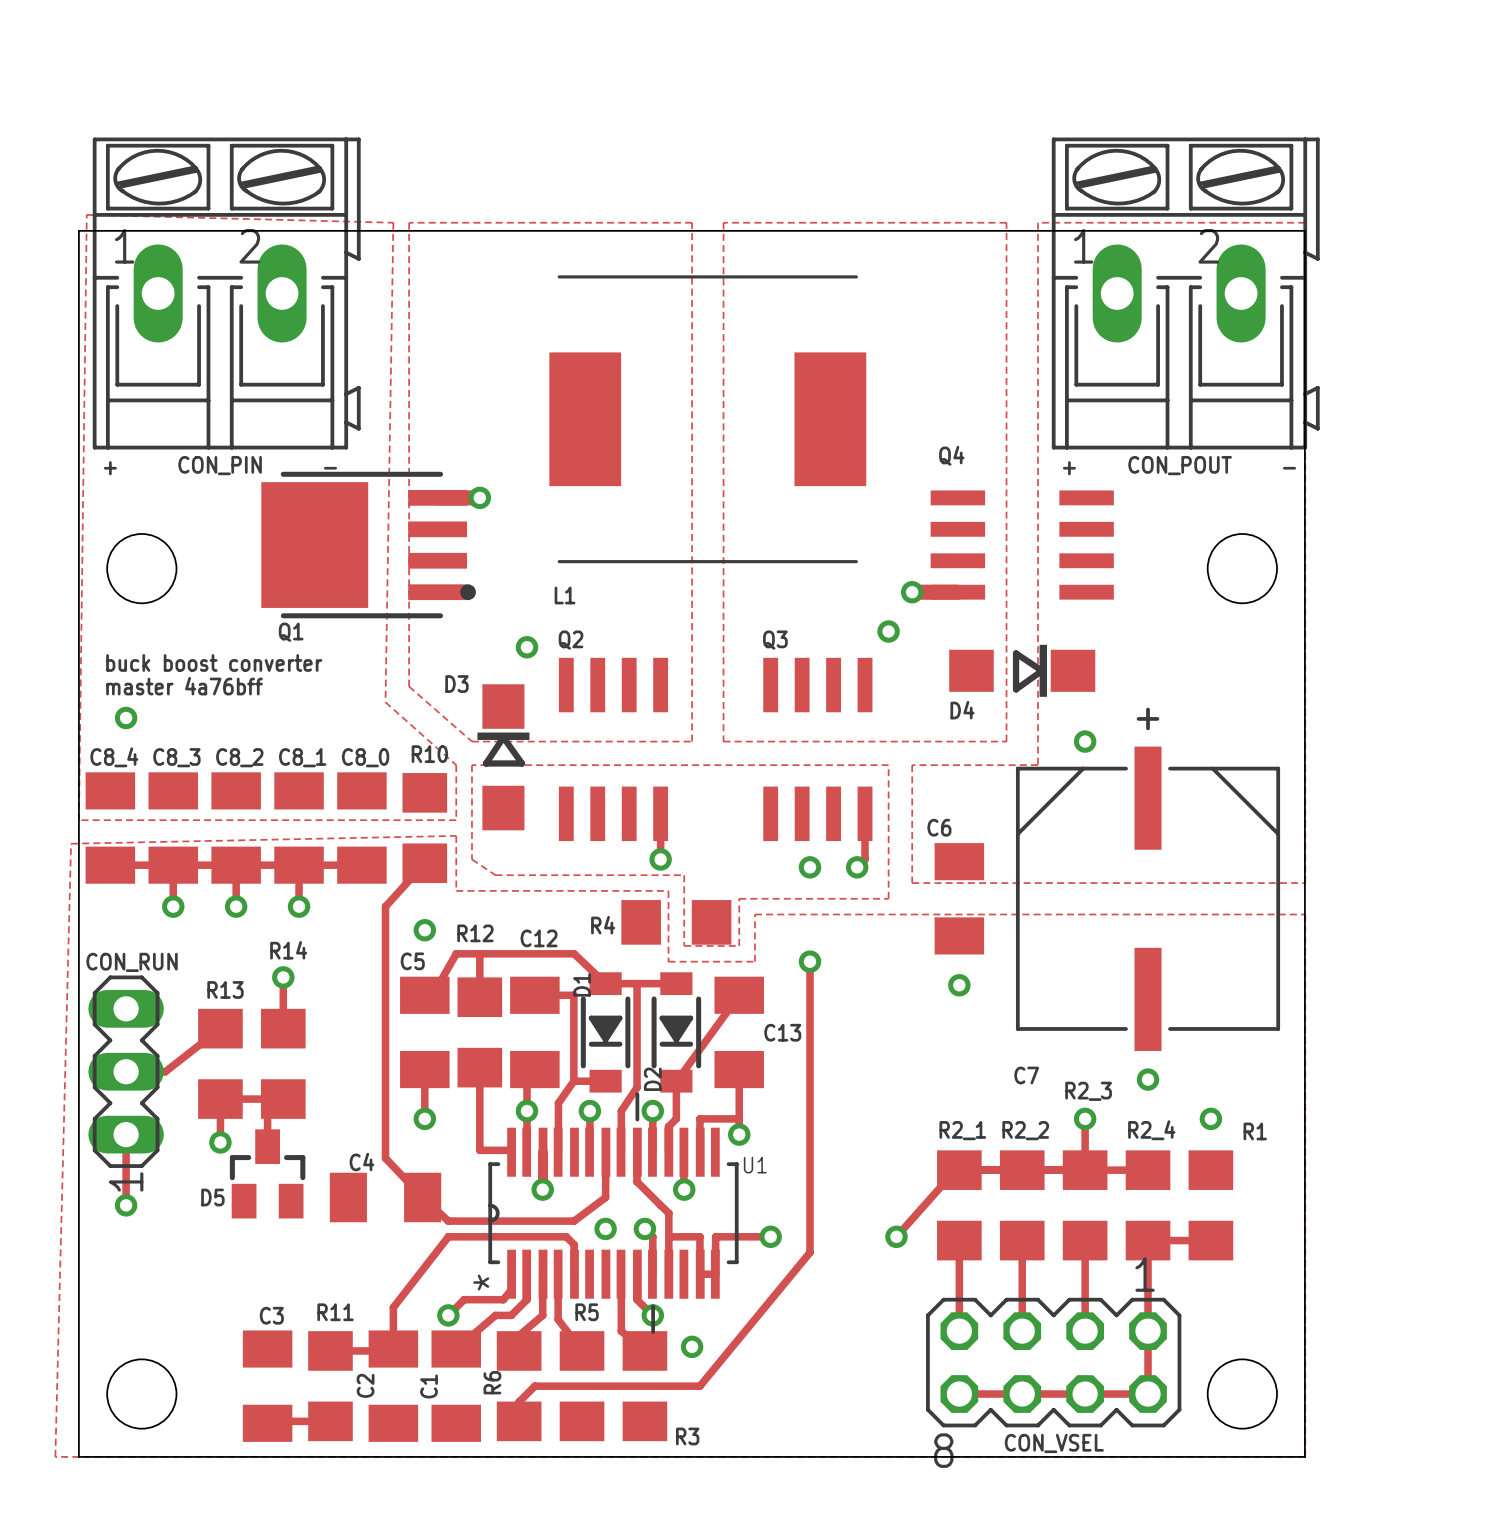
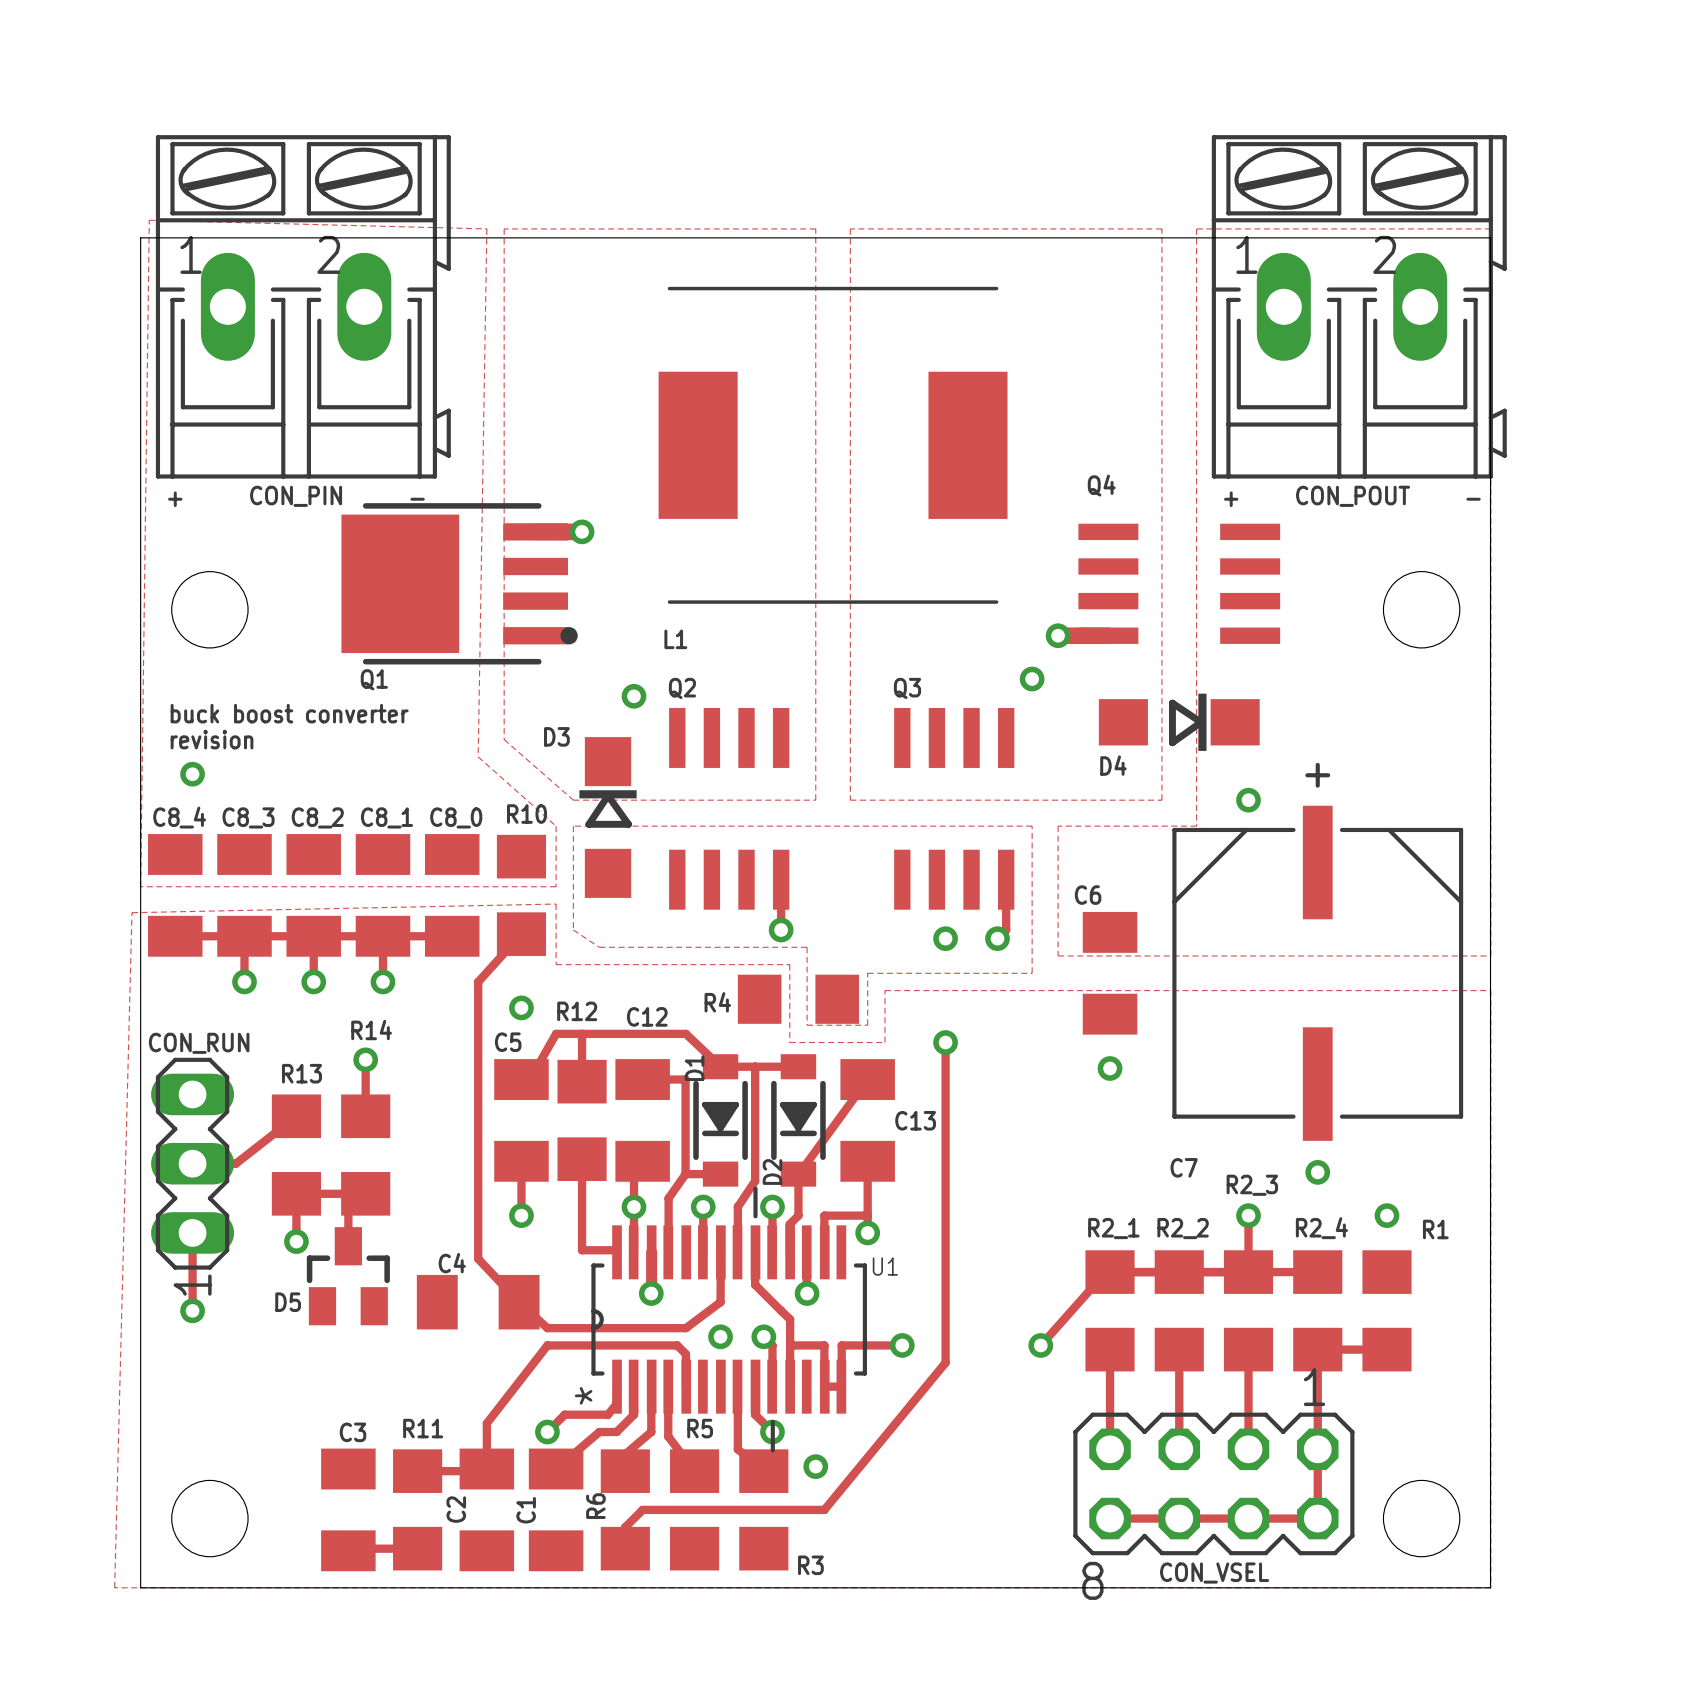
text: master 4a76bff (184, 686) -> revision (212, 739)

